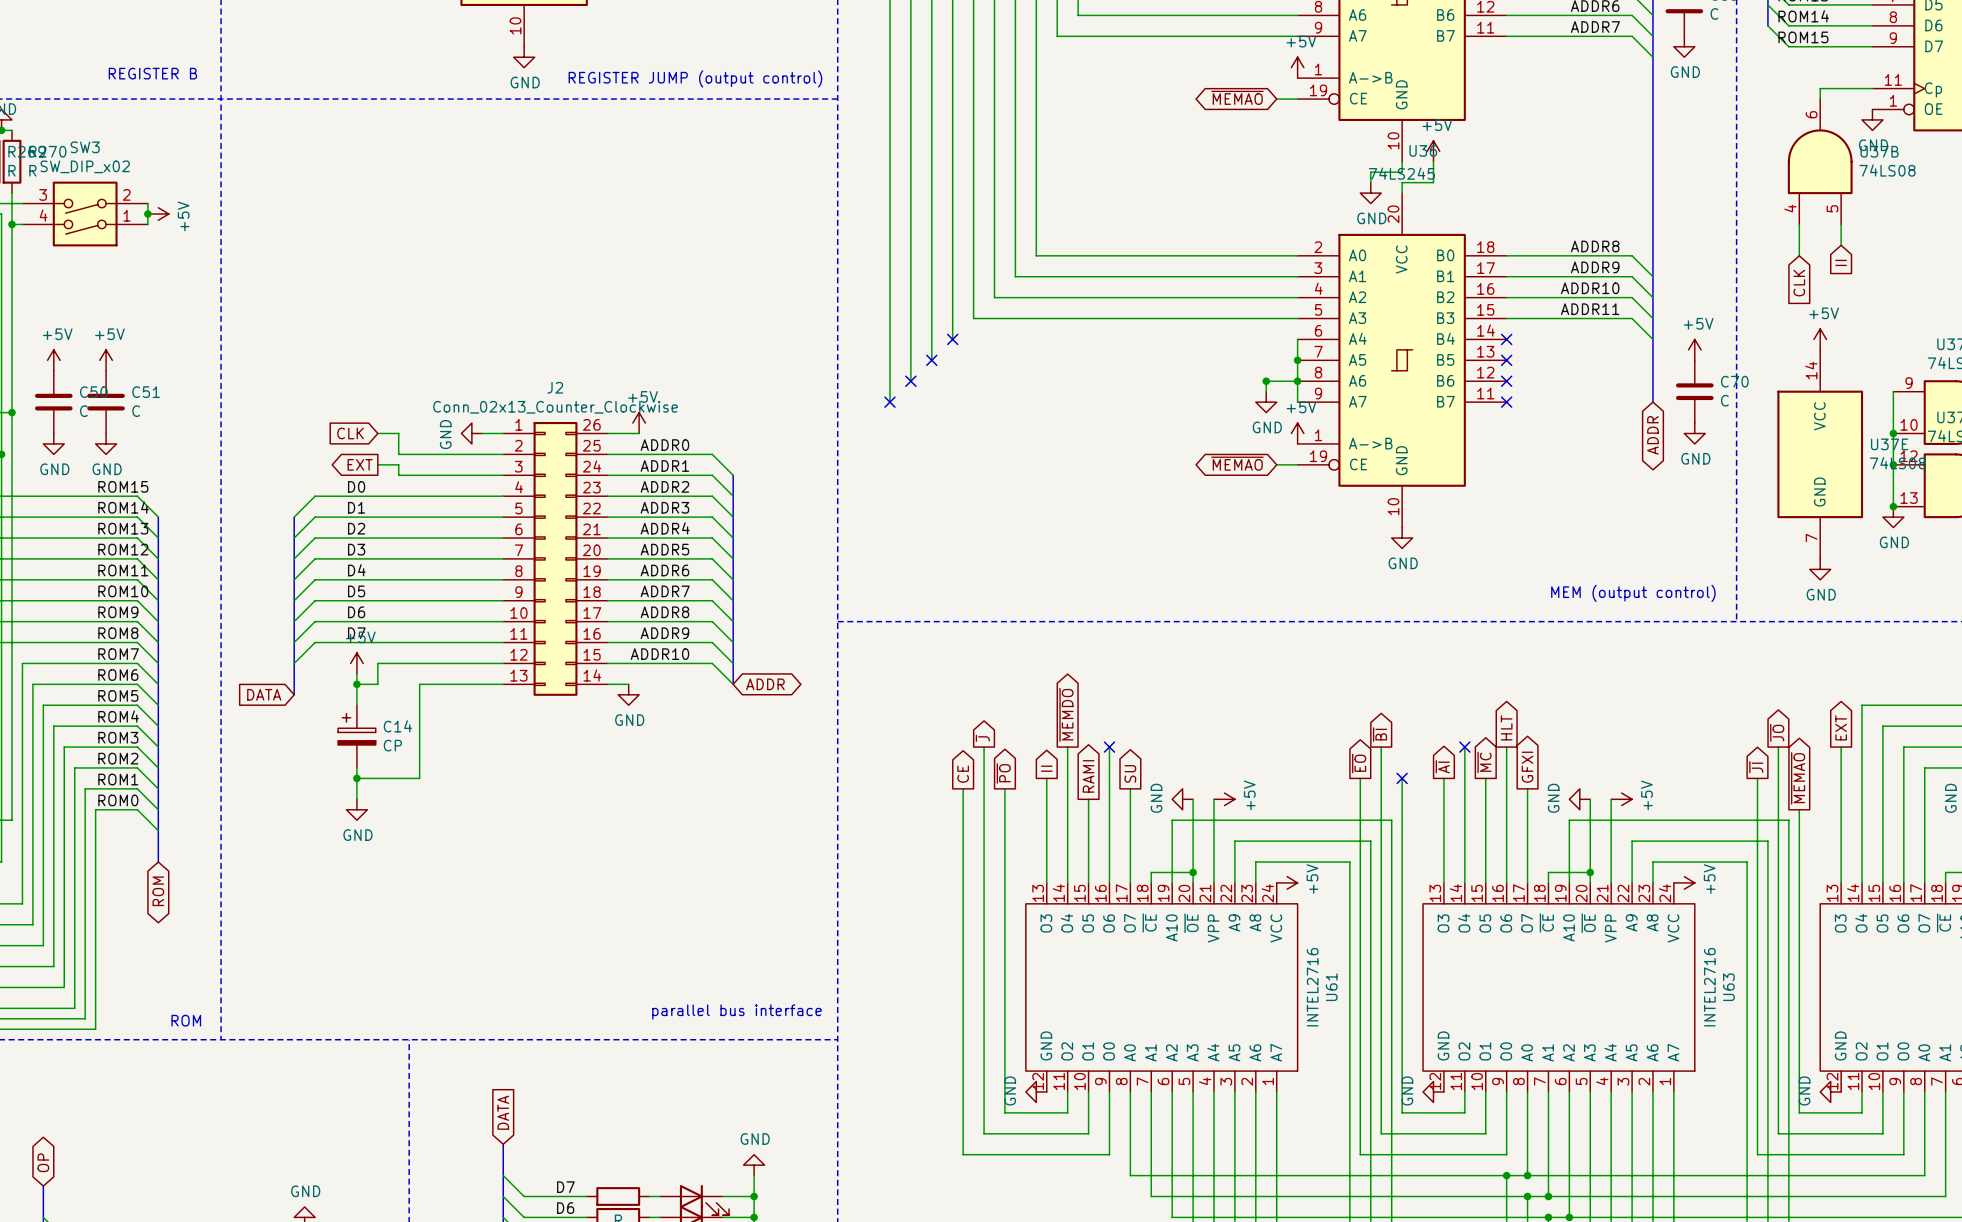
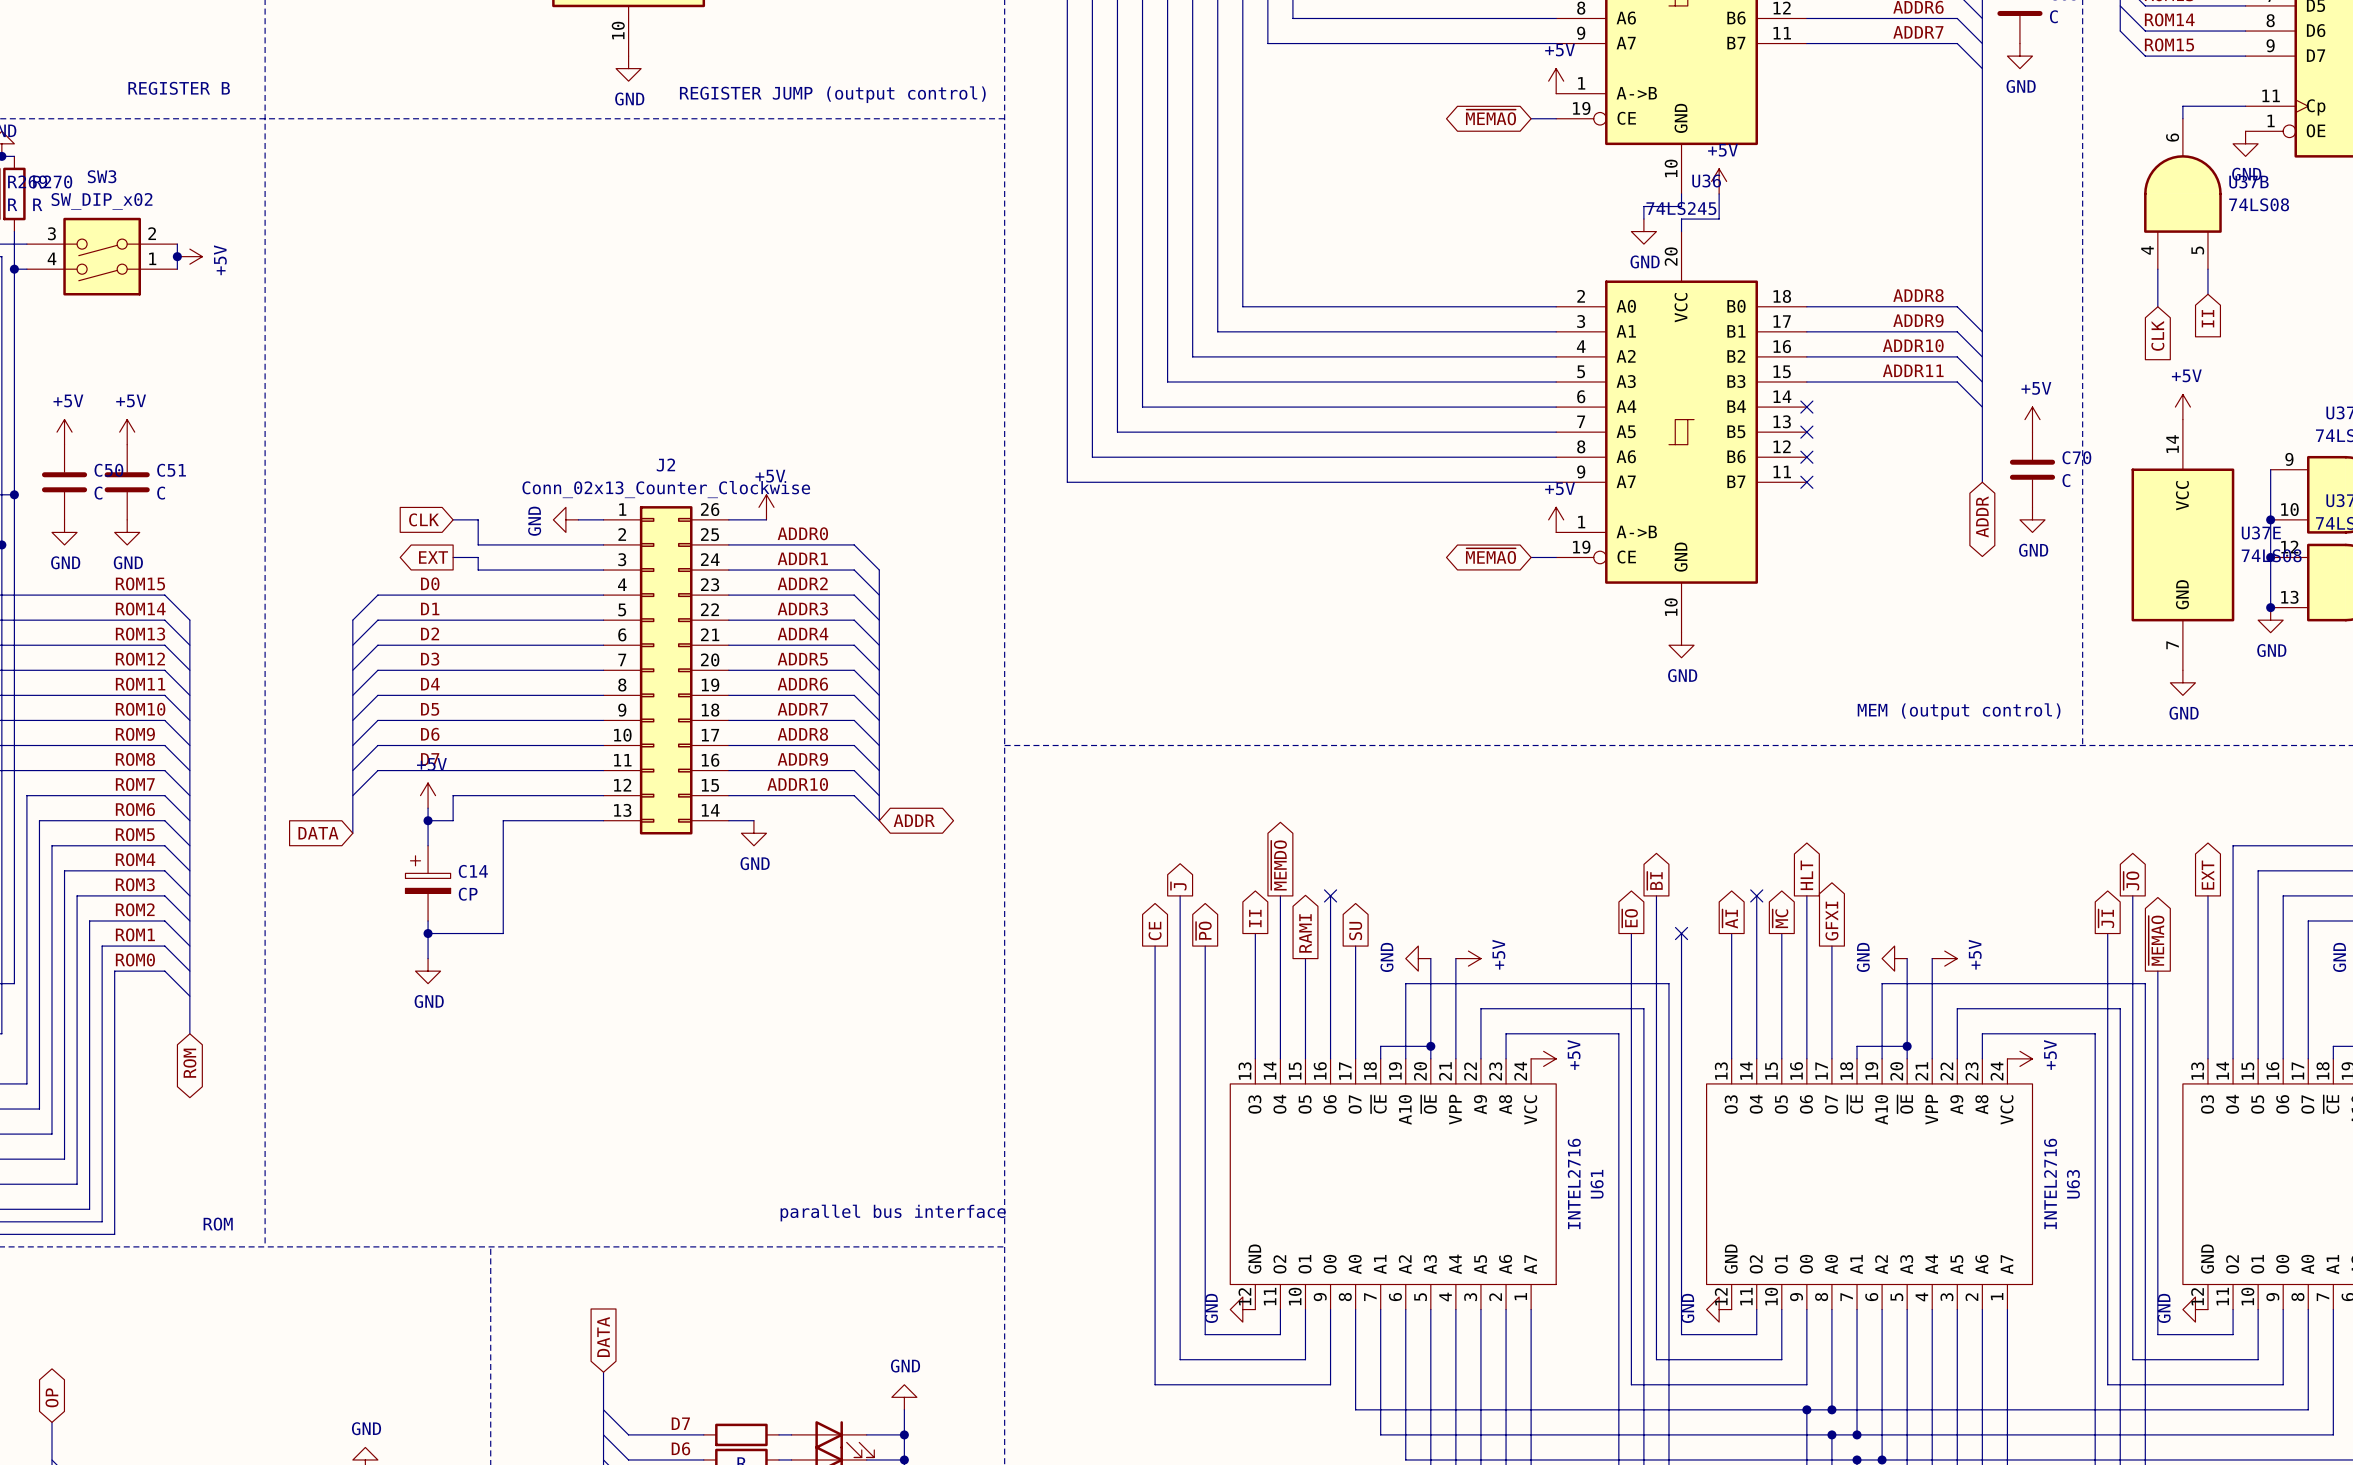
no-connect mark: (952, 339) -> none
wire: (1297, 339) (1297, 402) -> (1556, 407) (1142, 407)
wire: none -> (1117, 432) (1556, 432)
no-connect mark: (931, 360) -> none
junction: (1297, 360) -> none
no-connect mark: (910, 381) -> none
wire: (1266, 381) (1266, 391) -> (1518, 457) (1092, 457)
junction: (1266, 381) -> none
junction: (1297, 381) -> none
wire: none -> (1067, 482) (1556, 482)
no-connect mark: (889, 402) -> none
power symbol: GND (1266, 402) -> none

